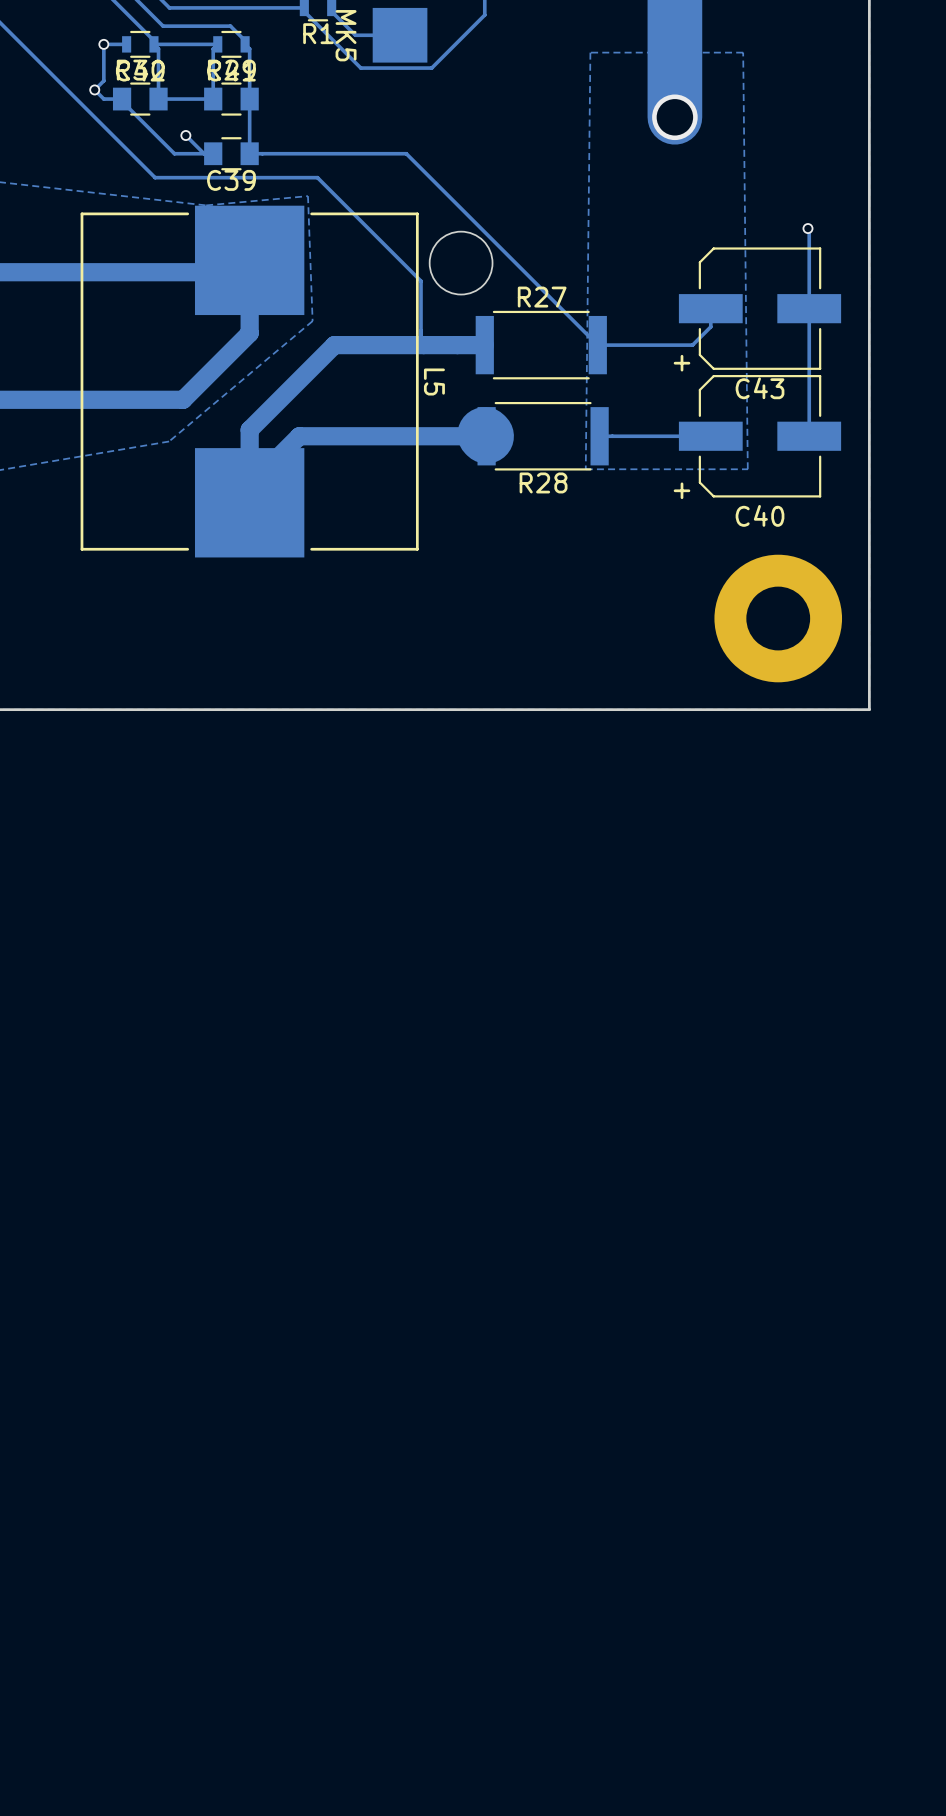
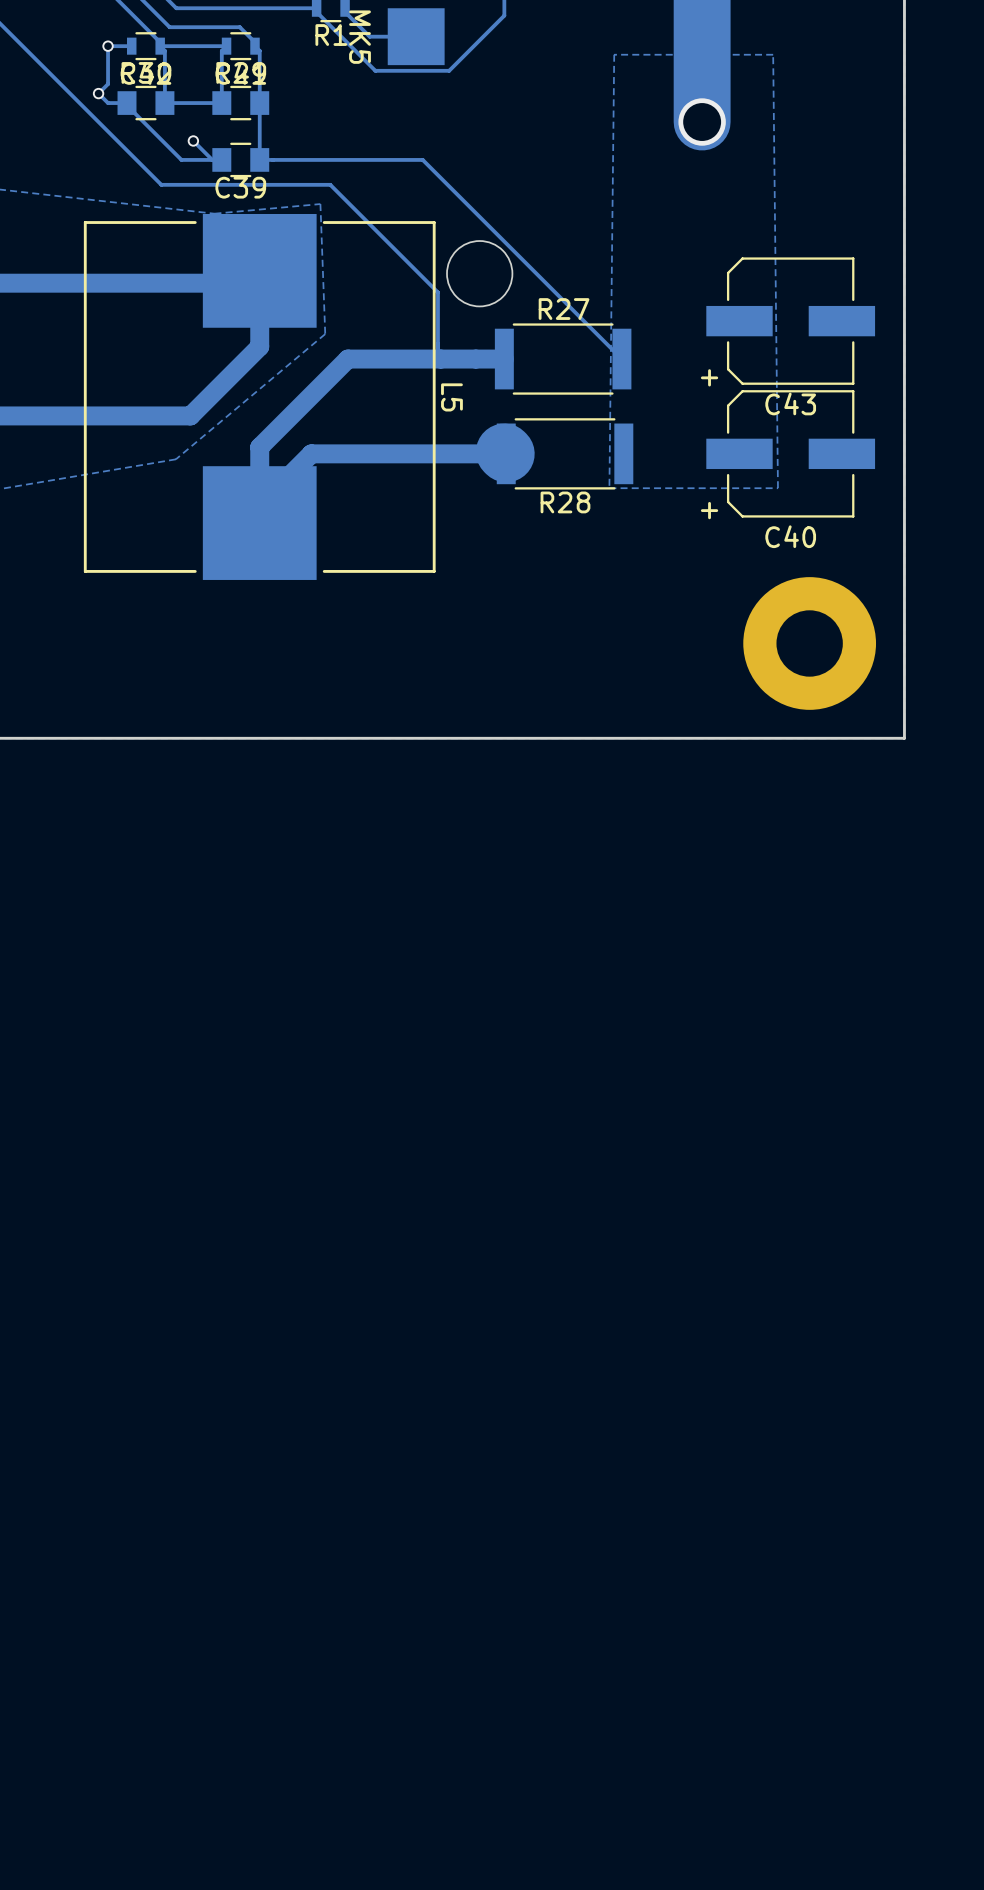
track: (807, 228) (809, 436) -> none
via: (807, 228) -> none
track: (710, 308) (710, 326) (692, 345) (597, 345) -> none
track: (710, 436) (599, 436) -> none

